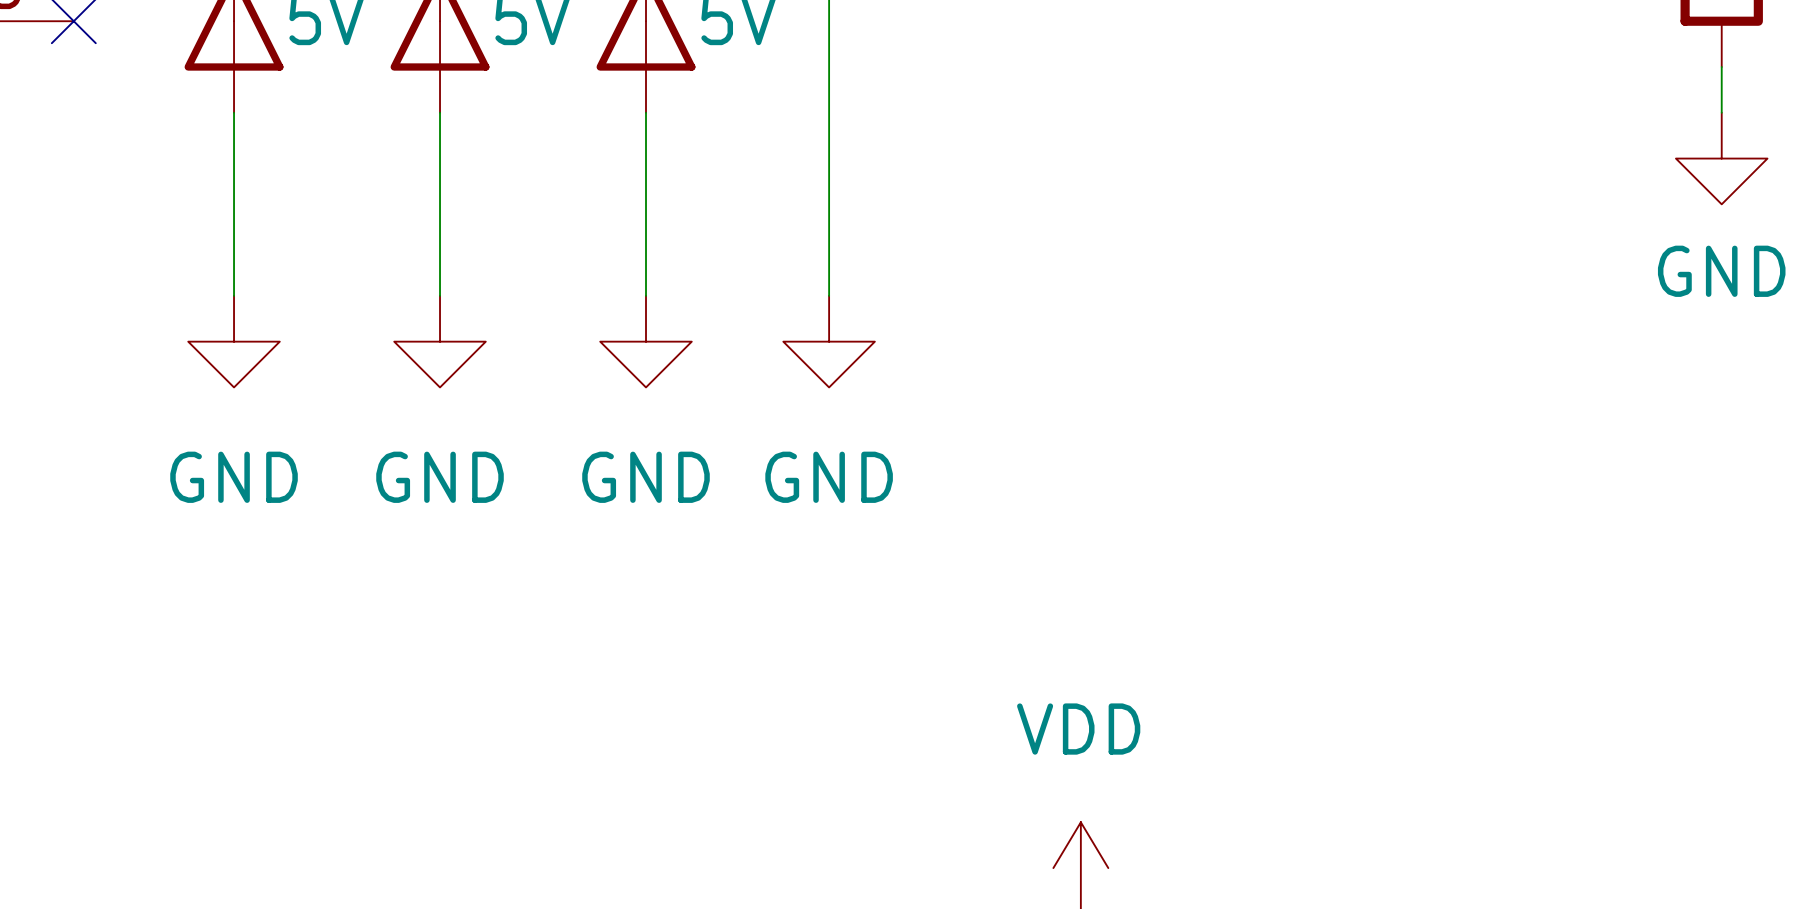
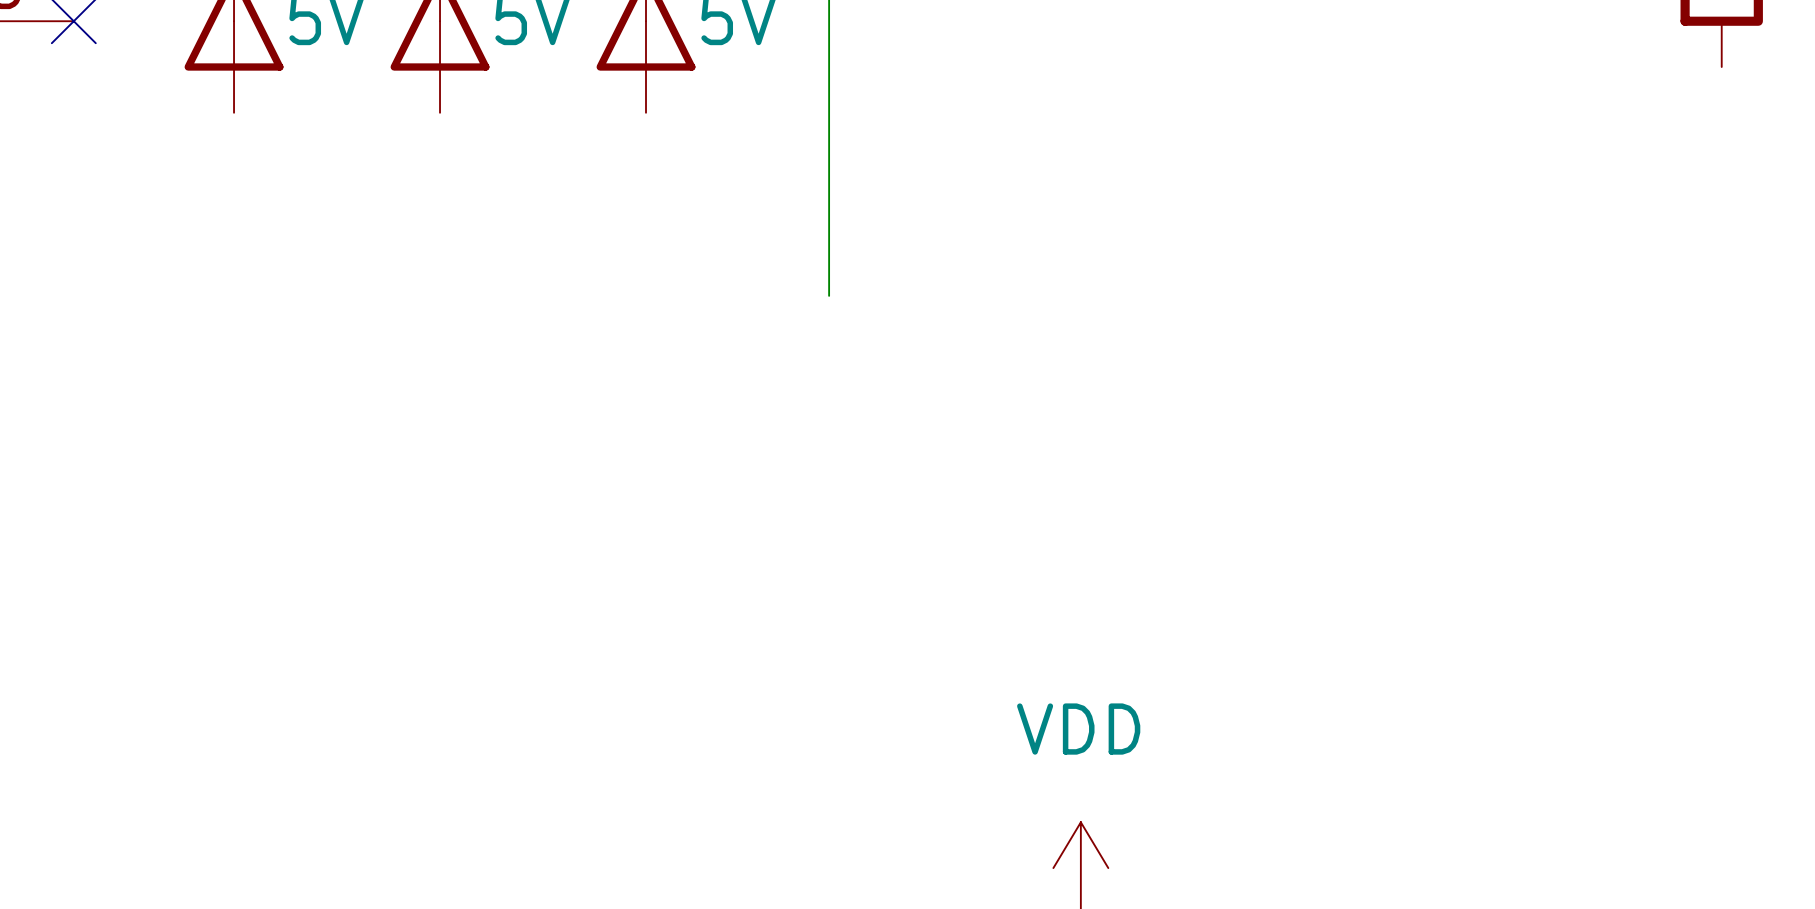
wire: (1721, 67) (1721, 112) -> none
wire: (234, 112) (234, 295) -> none
wire: (440, 112) (440, 295) -> none
wire: (646, 112) (646, 295) -> none
power symbol: GND (1721, 158) -> none
power symbol: GND (234, 341) -> none
power symbol: GND (440, 341) -> none
power symbol: GND (646, 341) -> none
power symbol: GND (829, 341) -> none

